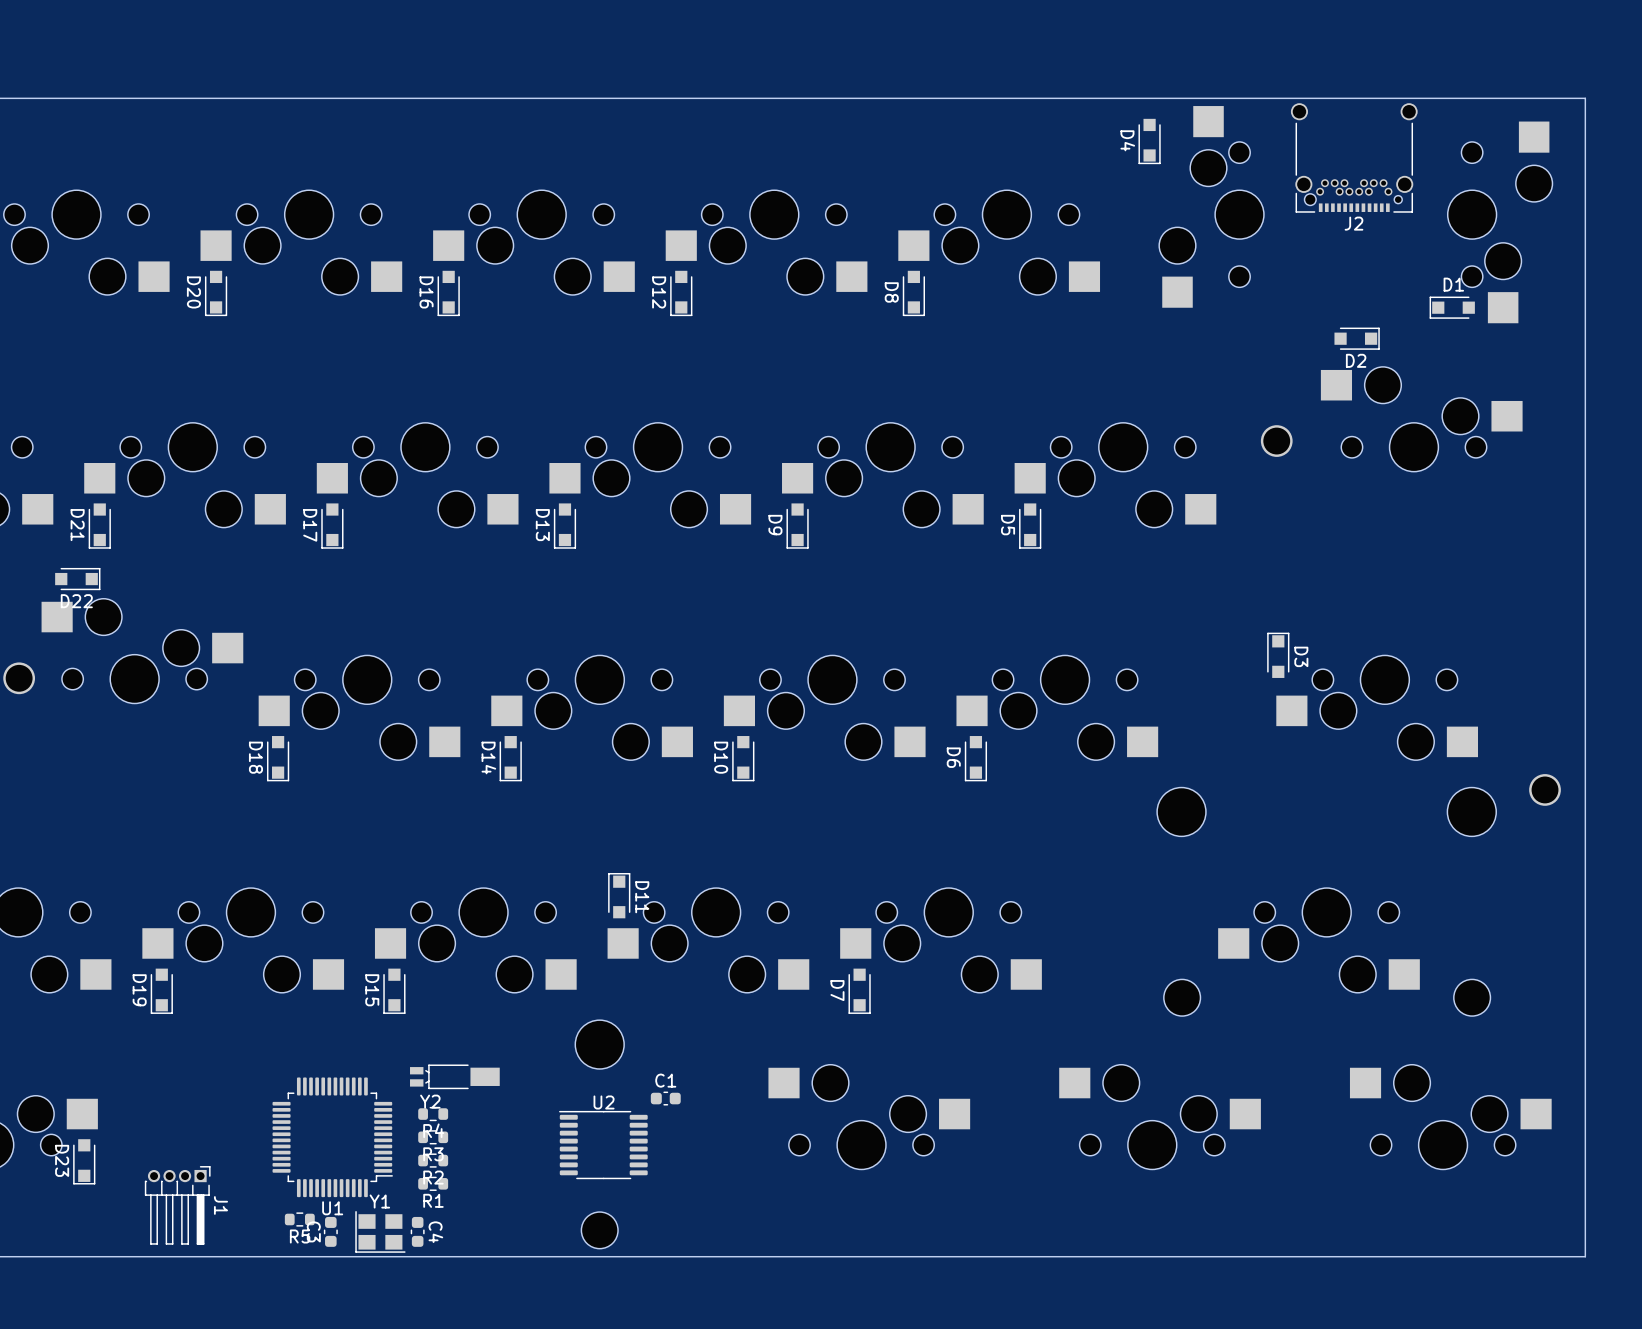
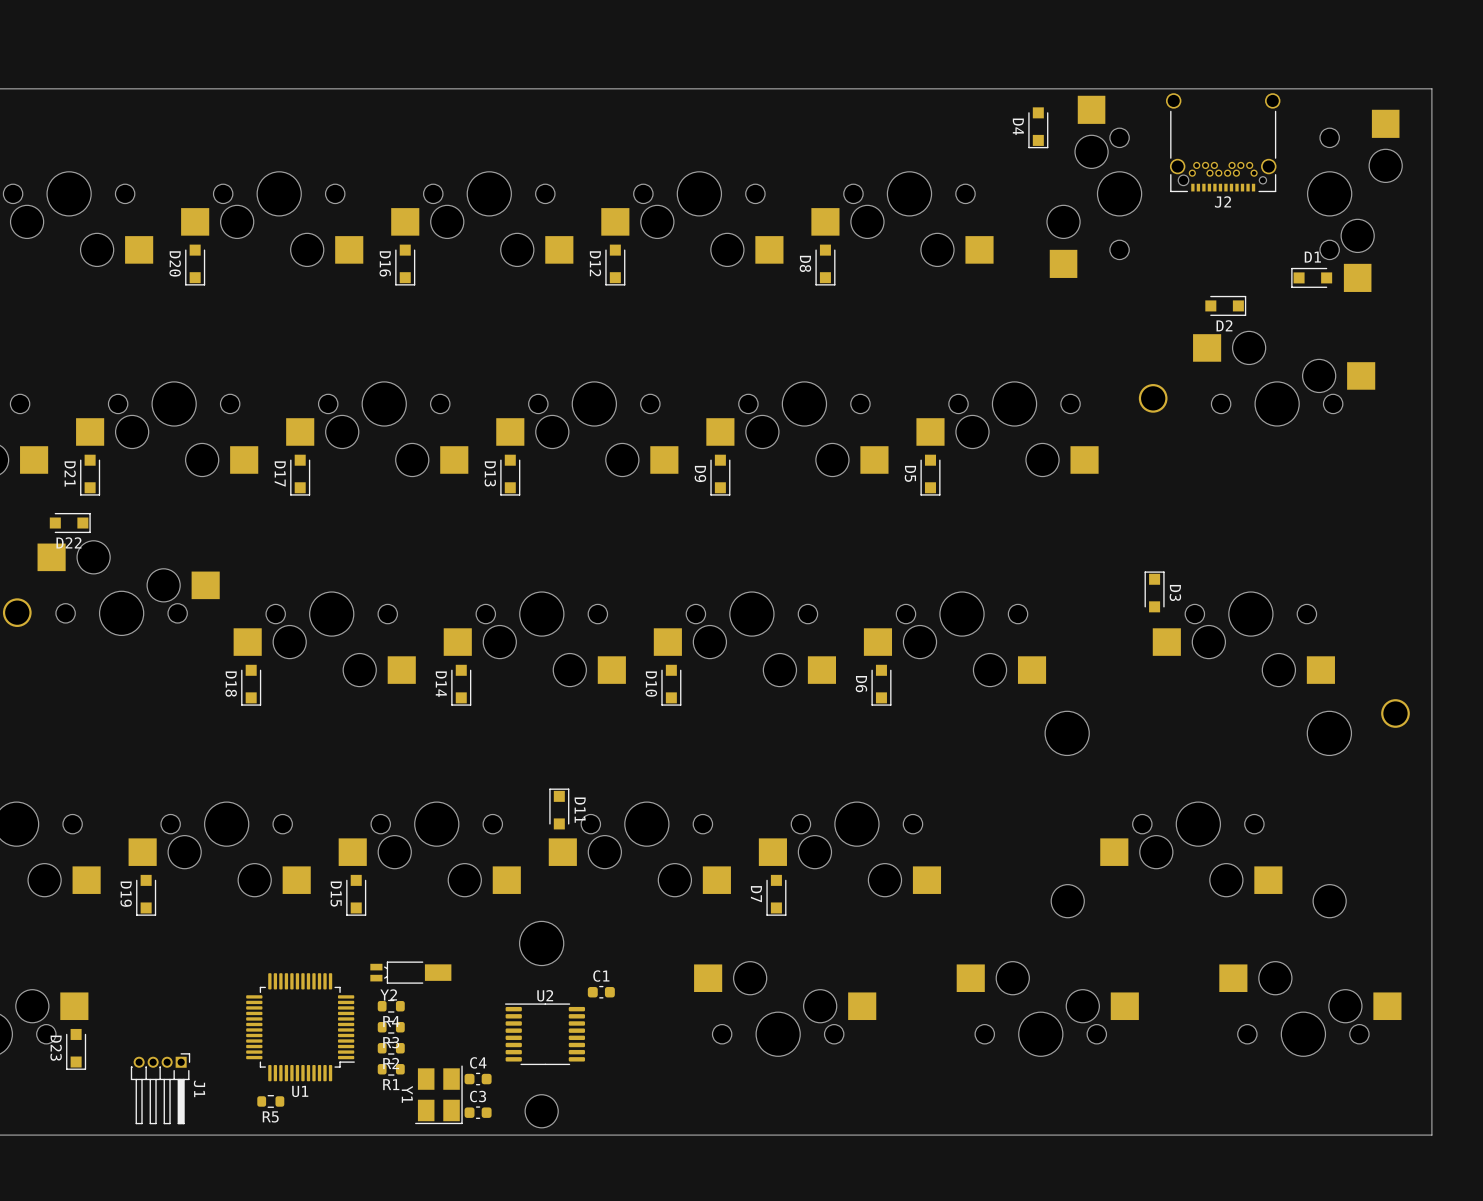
Y1 name position: Y1 (379, 1201) -> Y1 (407, 1094)
Y1 footprint: [355, 1211, 406, 1253] -> [415, 1065, 463, 1125]
C3 rotation: 0° (330, 1231) -> 90° clockwise (478, 1112)
C3 position: (330, 1231) -> (478, 1112)
C4 rotation: 0° (417, 1231) -> 90° clockwise (478, 1079)
C4 position: (417, 1231) -> (478, 1079)
C4 name position: C4 (435, 1232) -> C4 (478, 1062)

